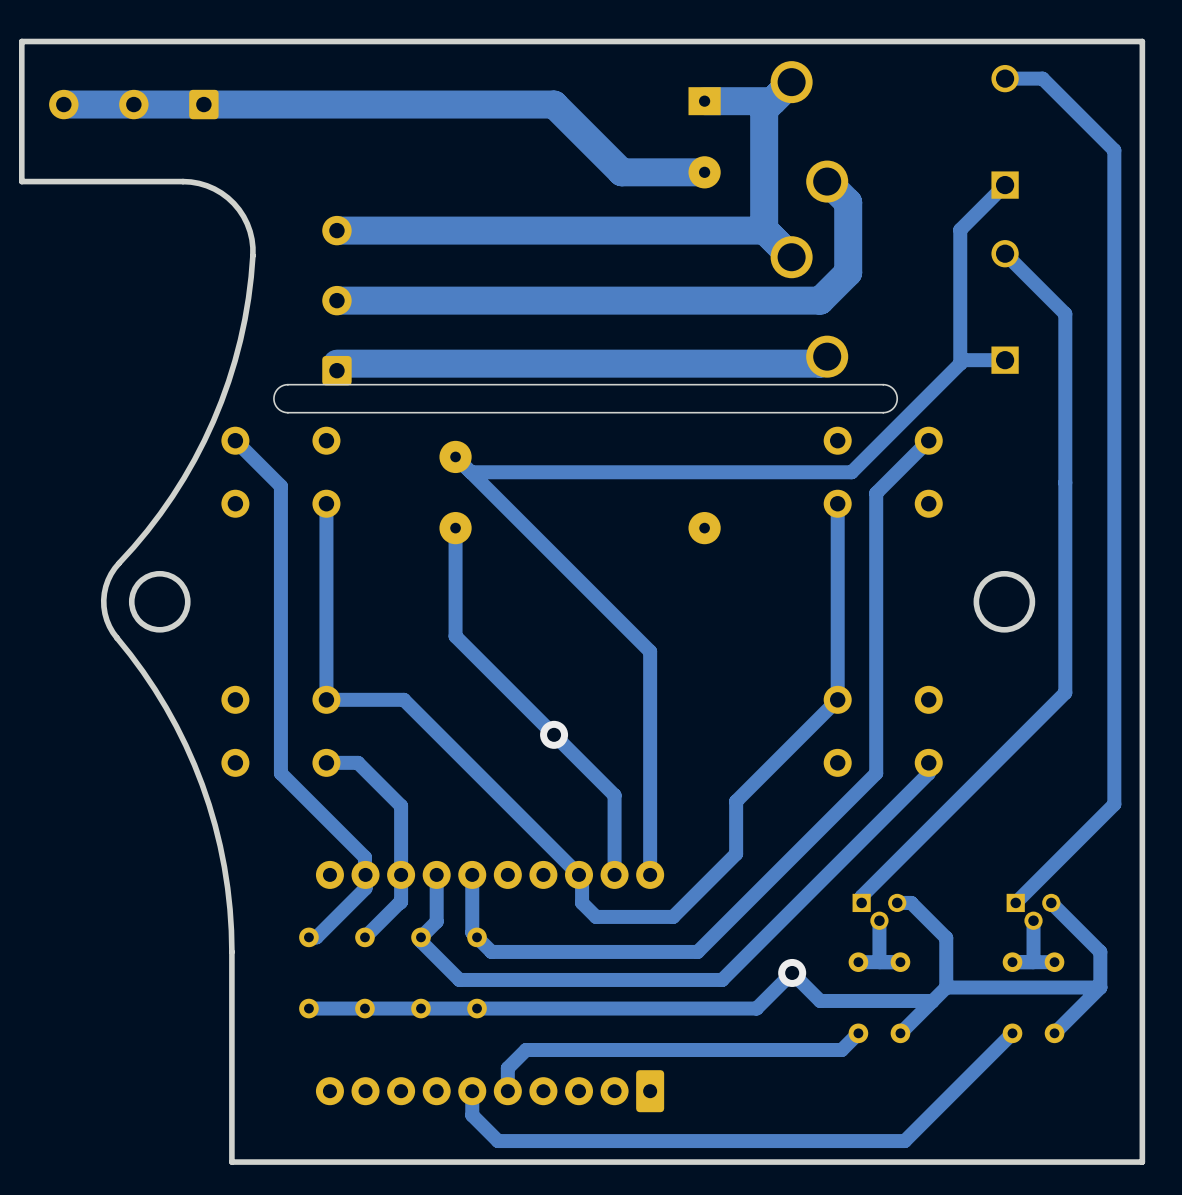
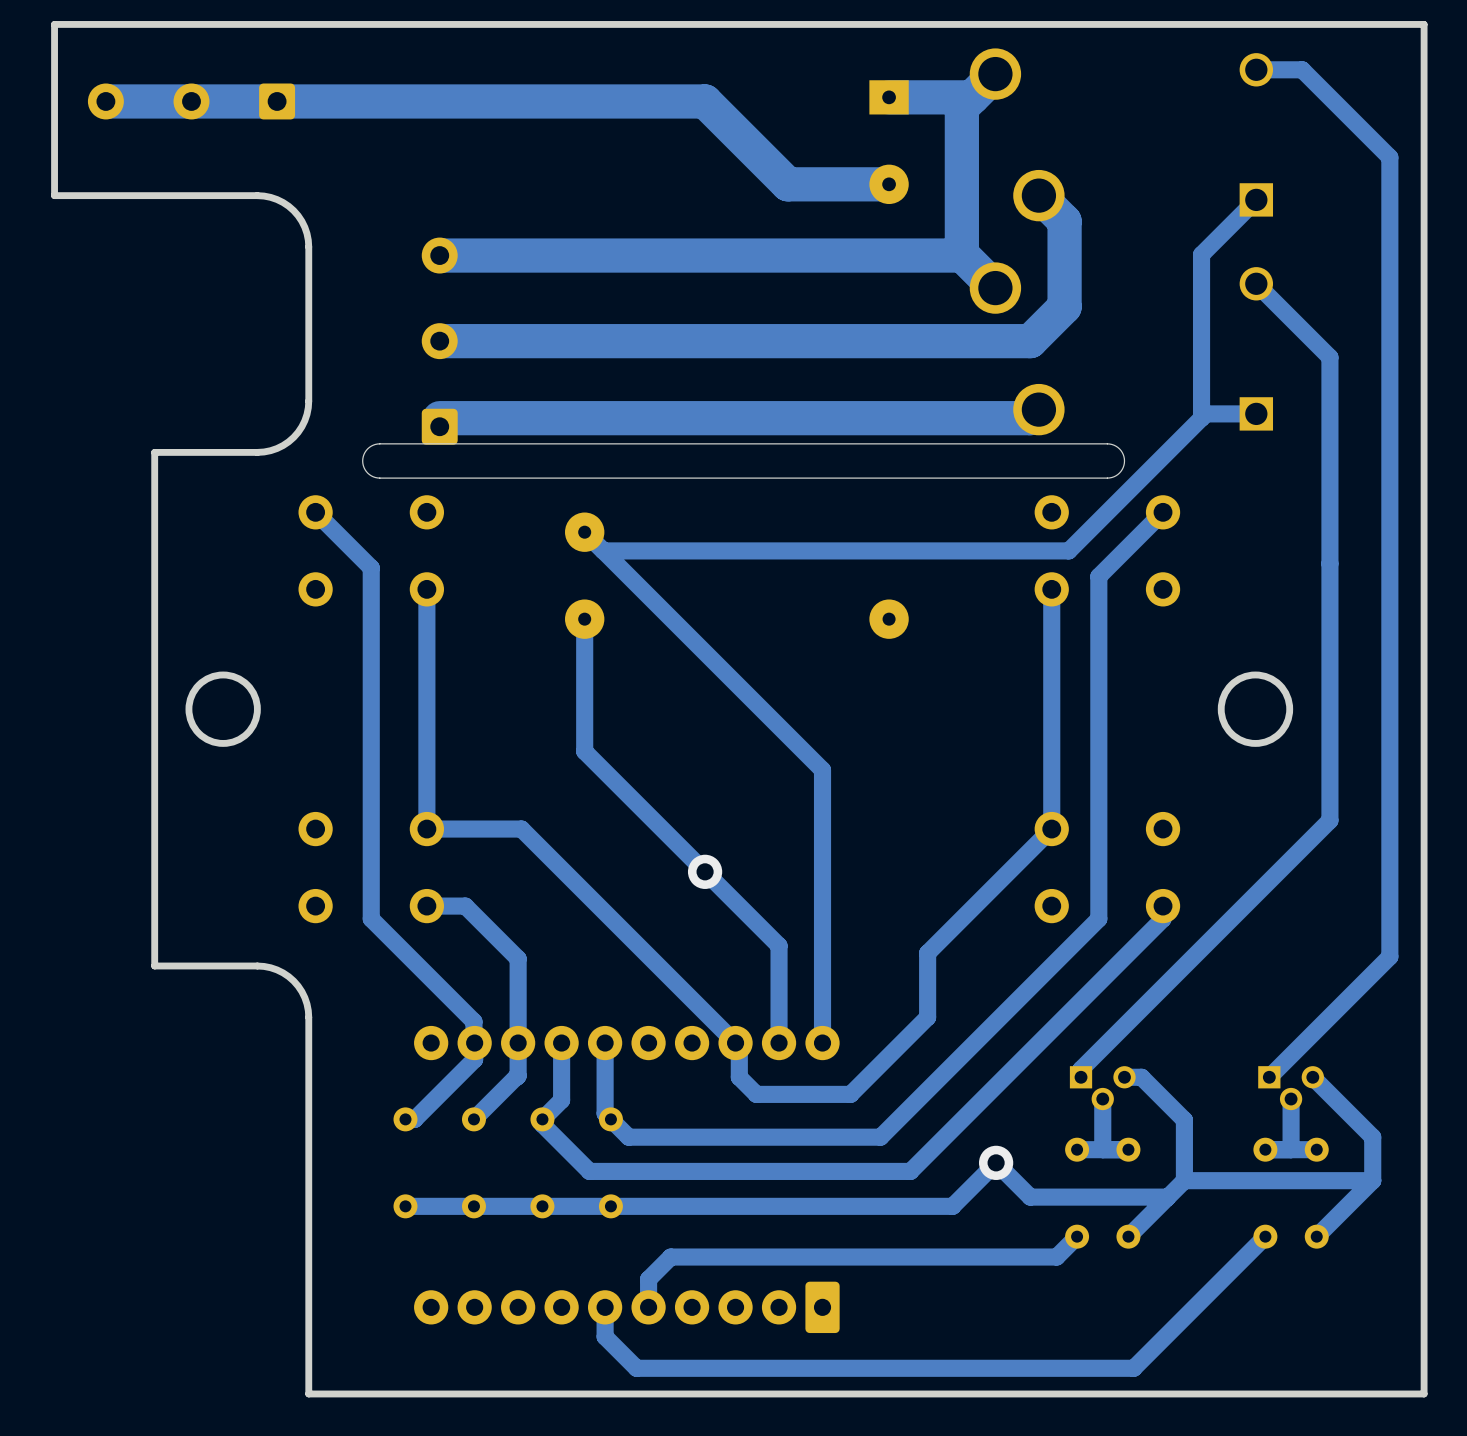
board edge: (182, 181) (199, 183) (221, 193) (233, 203) (247, 223) (251, 239) (252, 255) (244, 319) (228, 381) (204, 440) (183, 478) (160, 513) (111, 574) (104, 593) (103, 606) (106, 620) (112, 632) (154, 689) (185, 745) (202, 784) (220, 846) (227, 888) (231, 930) (231, 1162) -> (251, 195) (270, 197) (288, 206) (298, 215) (307, 233) (308, 246) (308, 407) (304, 420) (298, 432) (283, 445) (270, 450) (257, 452) (154, 452) (154, 966) (257, 966) (270, 967) (288, 976) (298, 986) (304, 997) (308, 1017) (308, 1393) (311, 1393)

